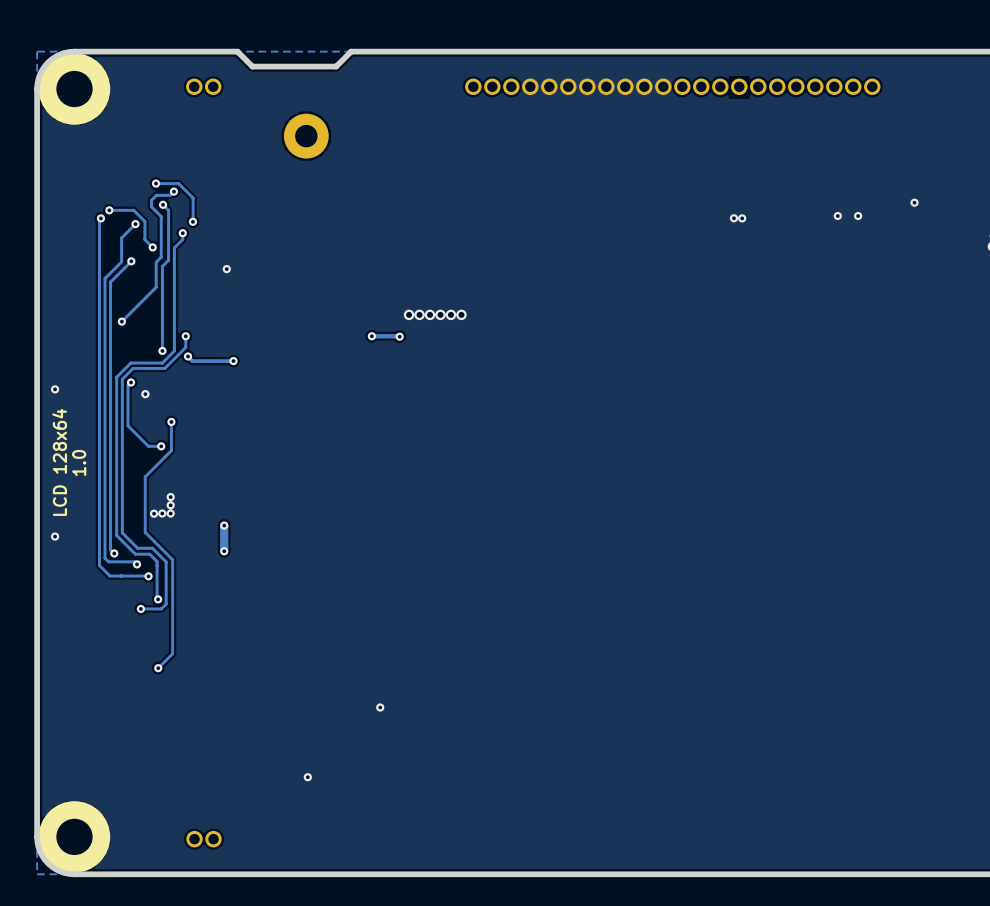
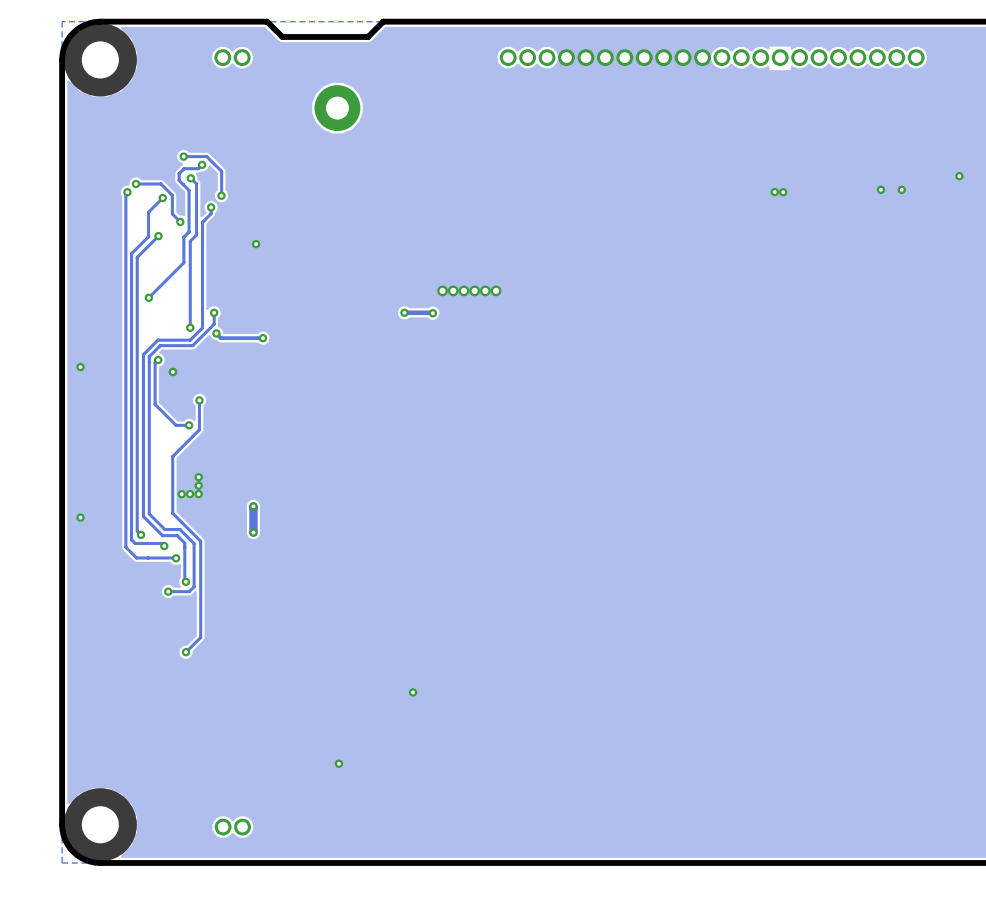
text: LCD 128x64 (59, 462) -> none
text: 1.0 (79, 462) -> none

